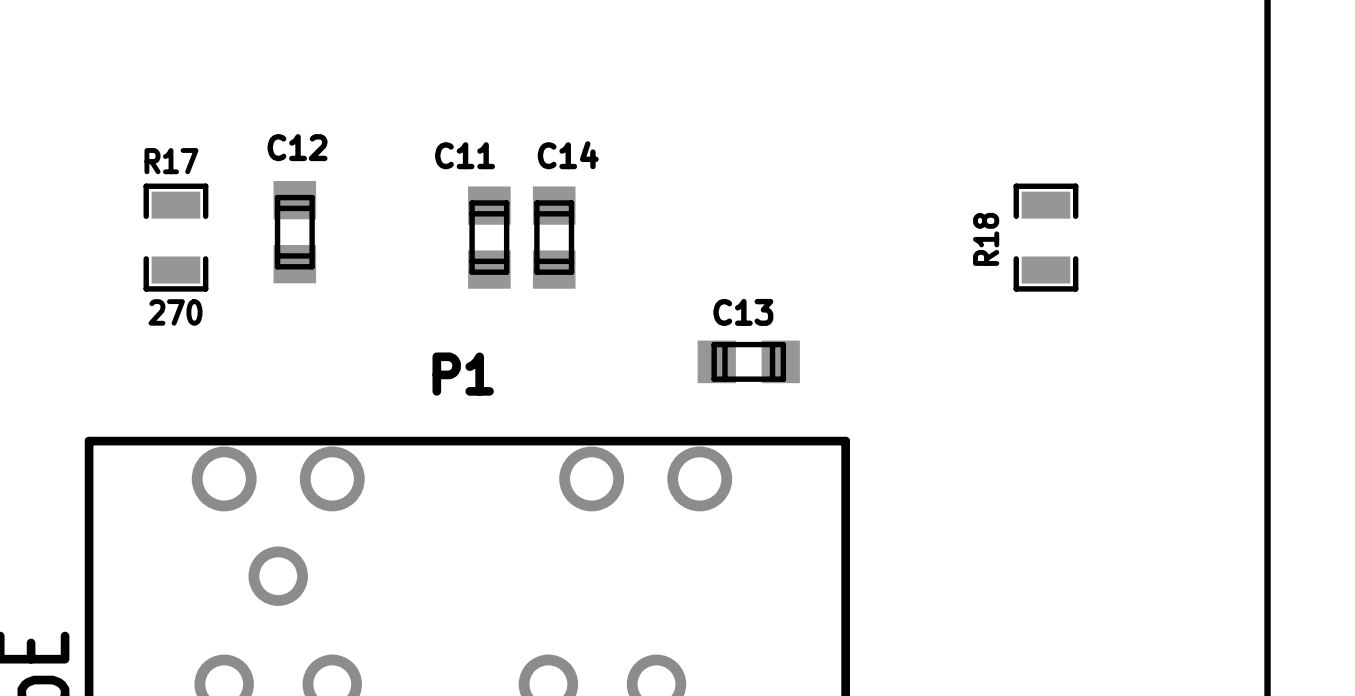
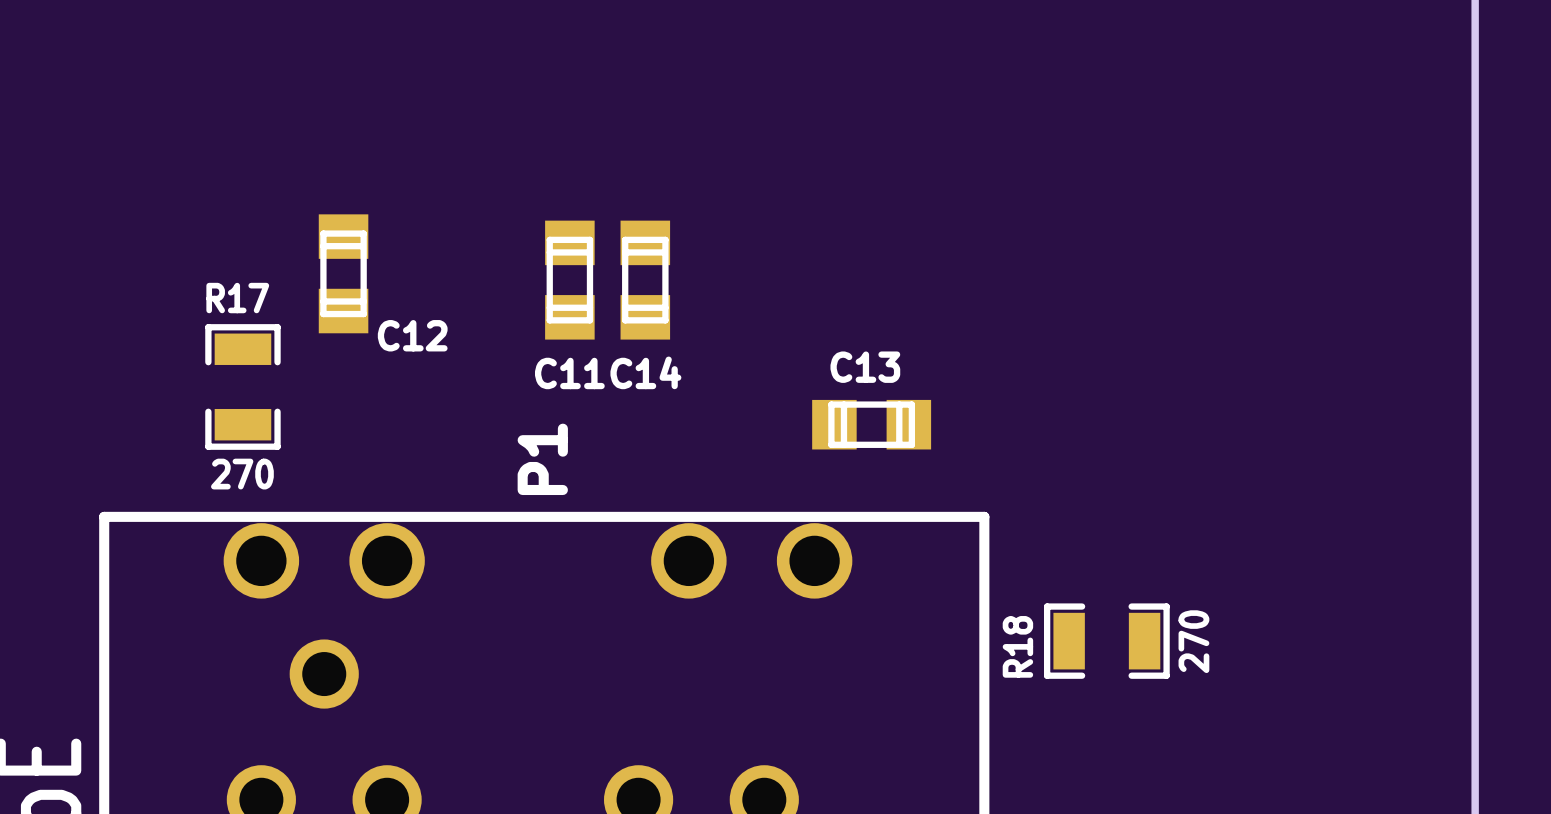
C12 name position: C12 (297, 147) -> C12 (412, 335)
C11 name position: C11 (465, 155) -> C11 (569, 373)
C14 name position: C14 (568, 155) -> C14 (645, 372)
R17 position: (175, 237) -> (242, 386)
R18 rotation: 0° (1045, 237) -> 90° clockwise (1106, 641)
R18 position: (1045, 237) -> (1106, 641)
P1 name rotation: 0° (463, 374) -> 90° counterclockwise (542, 459)
R18 value: none -> 270 (1193, 641)

